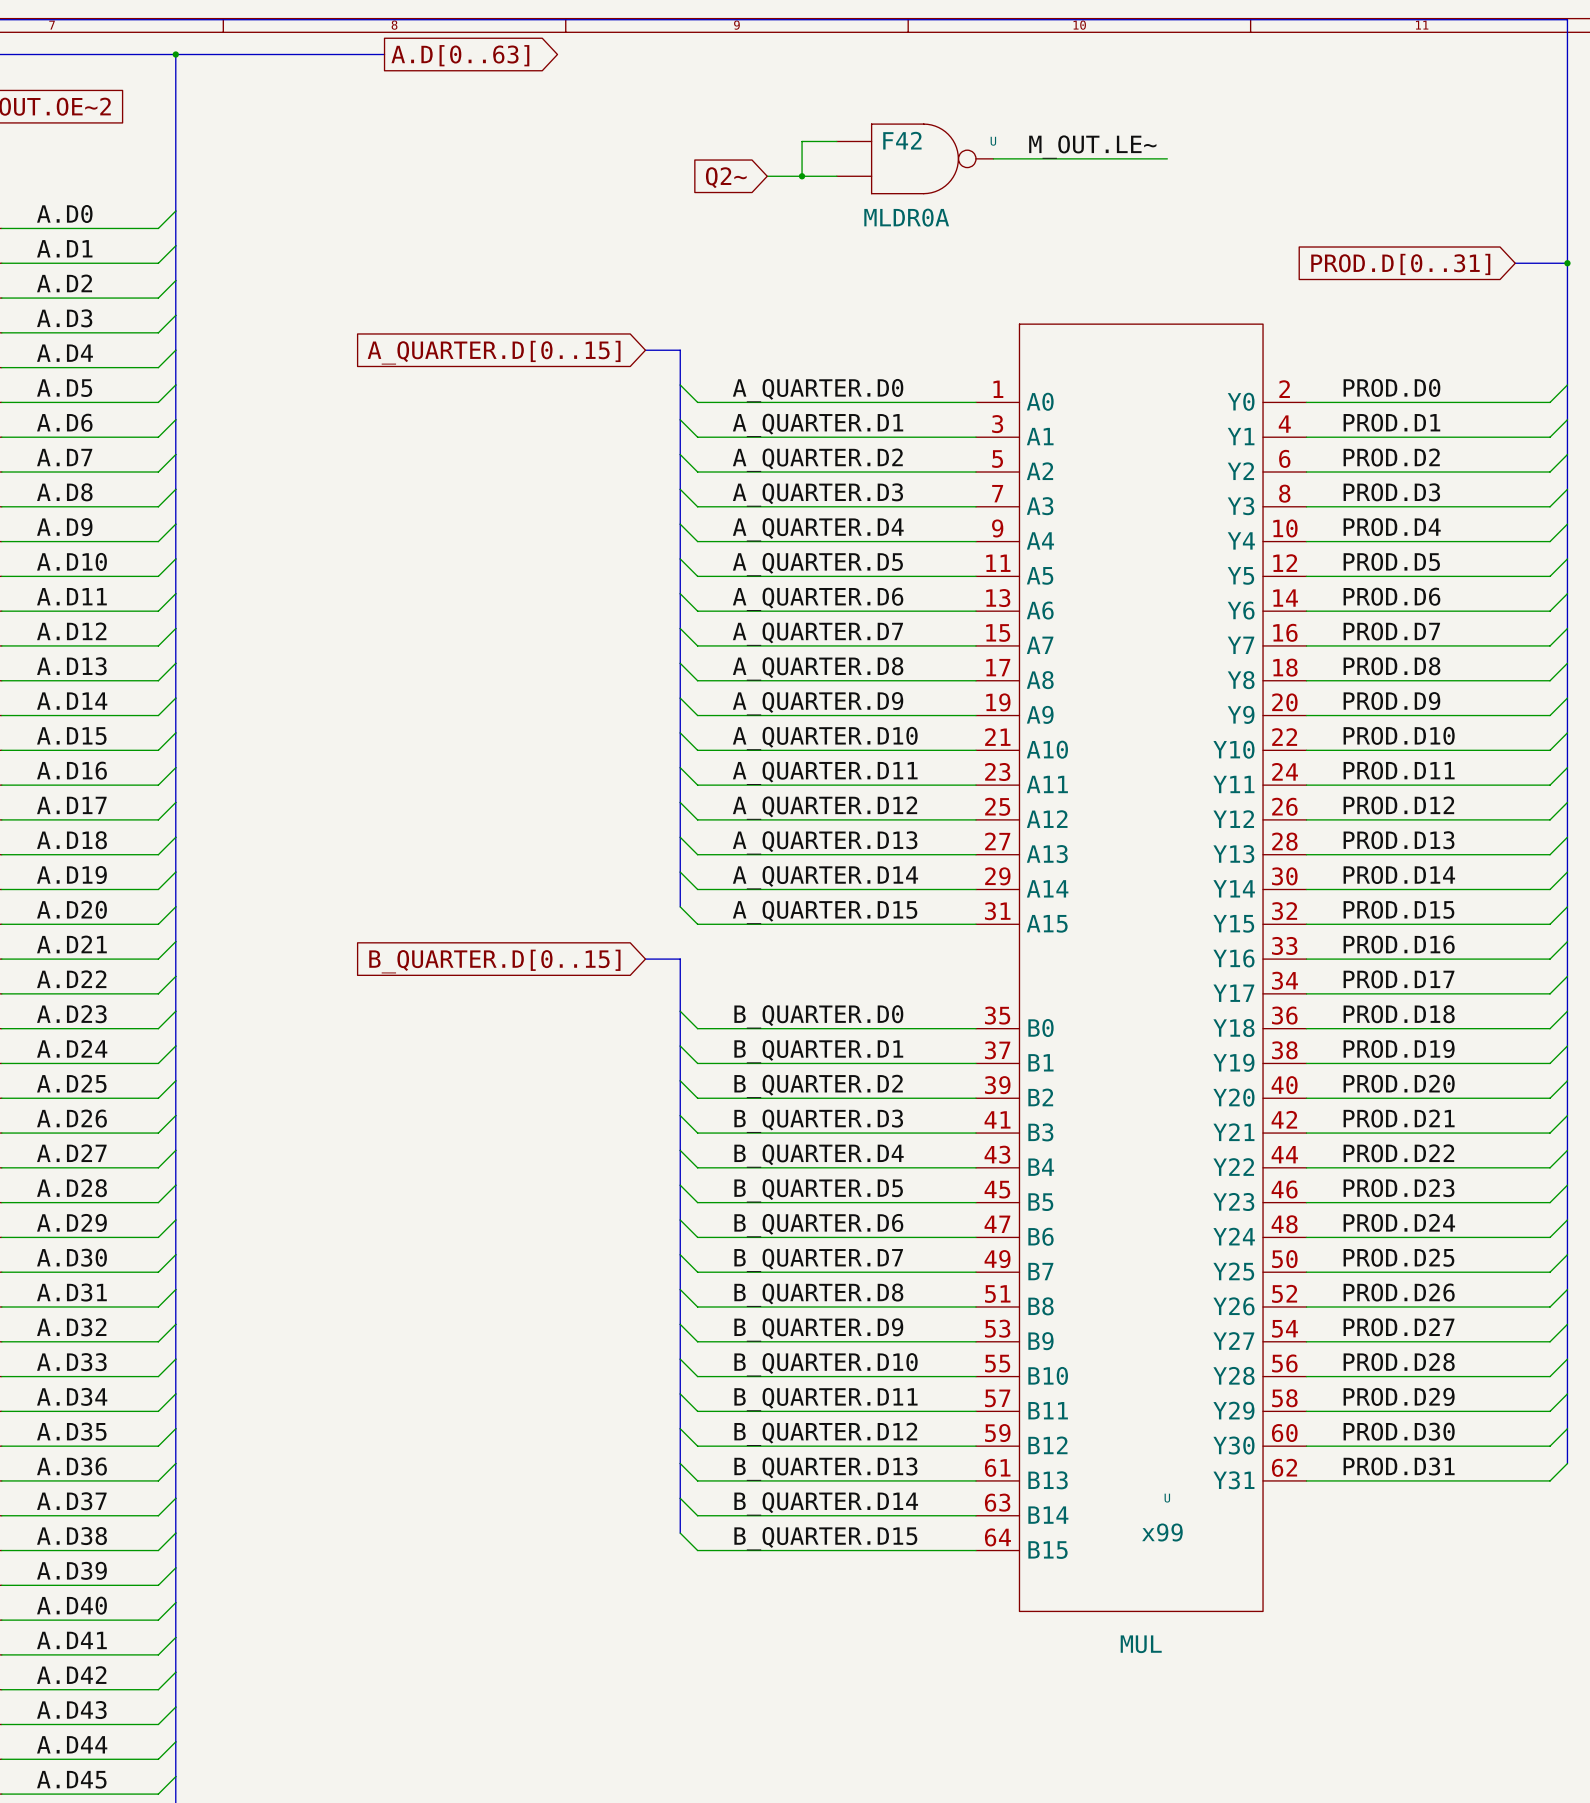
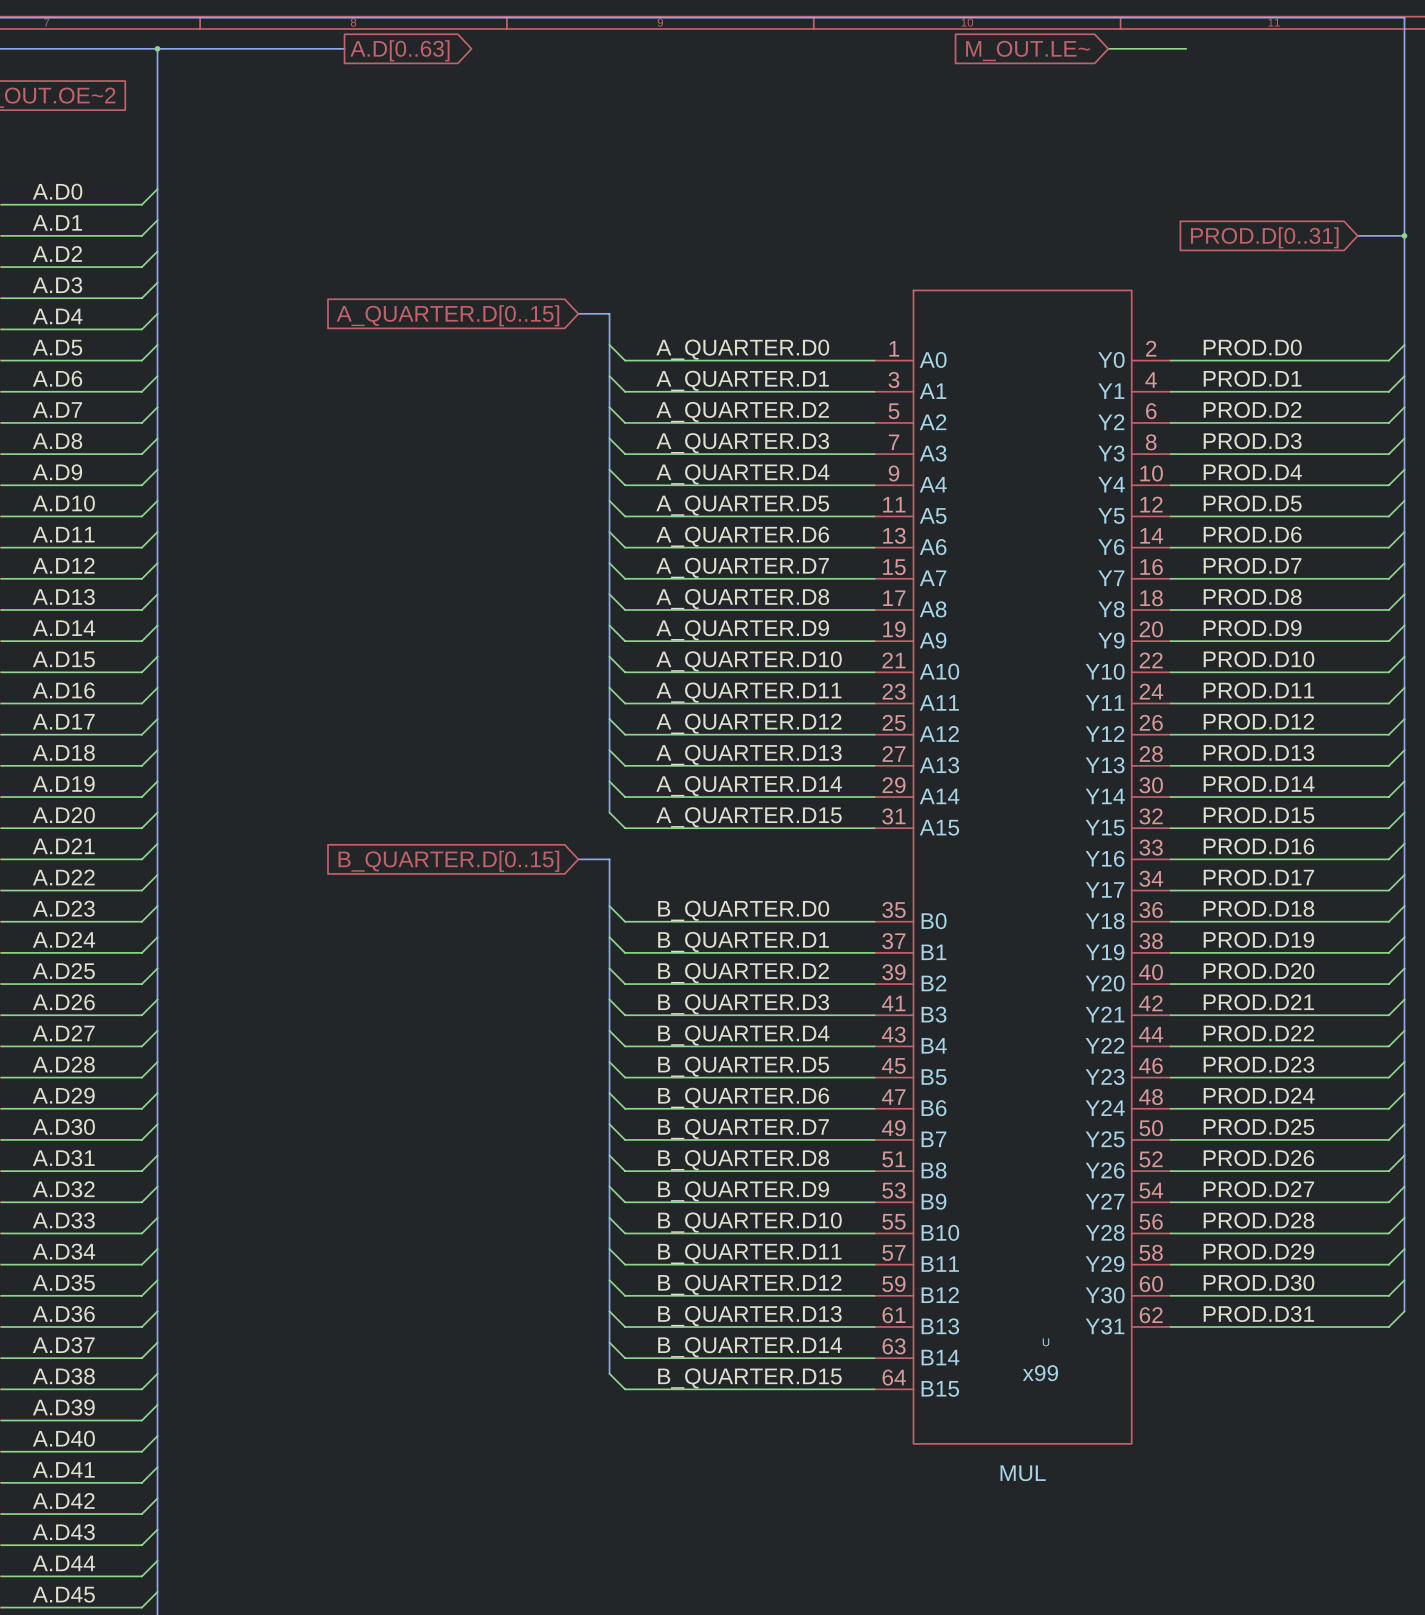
wire: none -> (1108, 48) (1186, 48)
global label: none -> M_OUT.LE~ (1027, 50)
wire: (836, 141) (802, 141) (802, 176) -> none
label: M_OUT.LE~ (1092, 147) -> none
U: (915, 158) -> none
wire: (993, 158) (1167, 158) -> none
wire: (767, 176) (836, 176) -> none
junction: (802, 176) -> none
global label: Q2~ (726, 177) -> none

